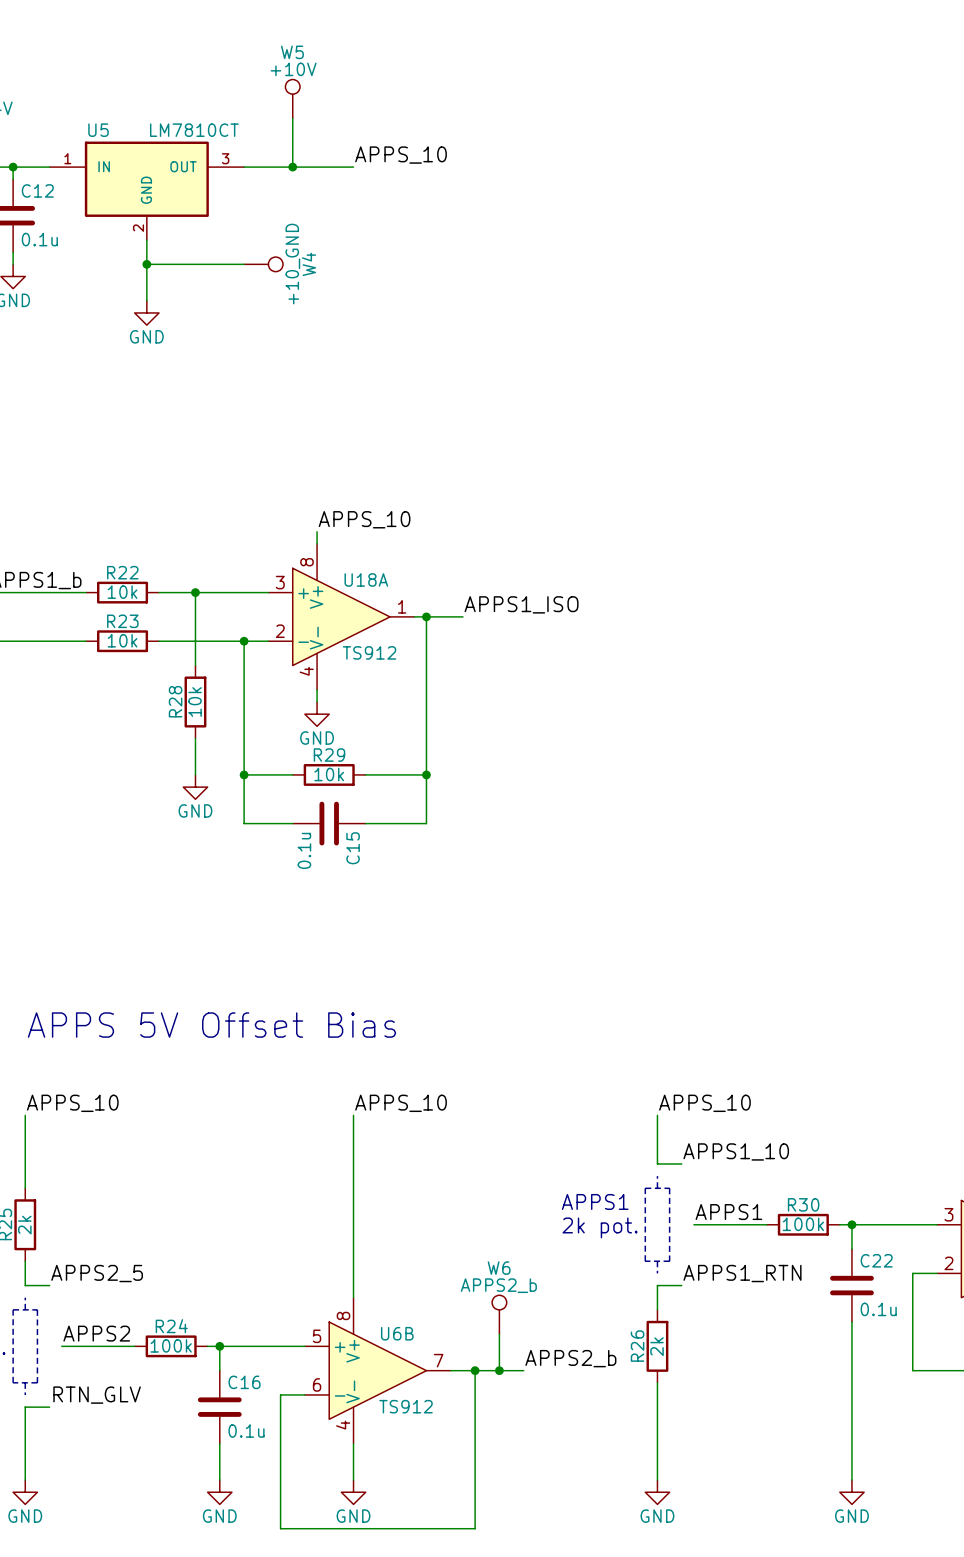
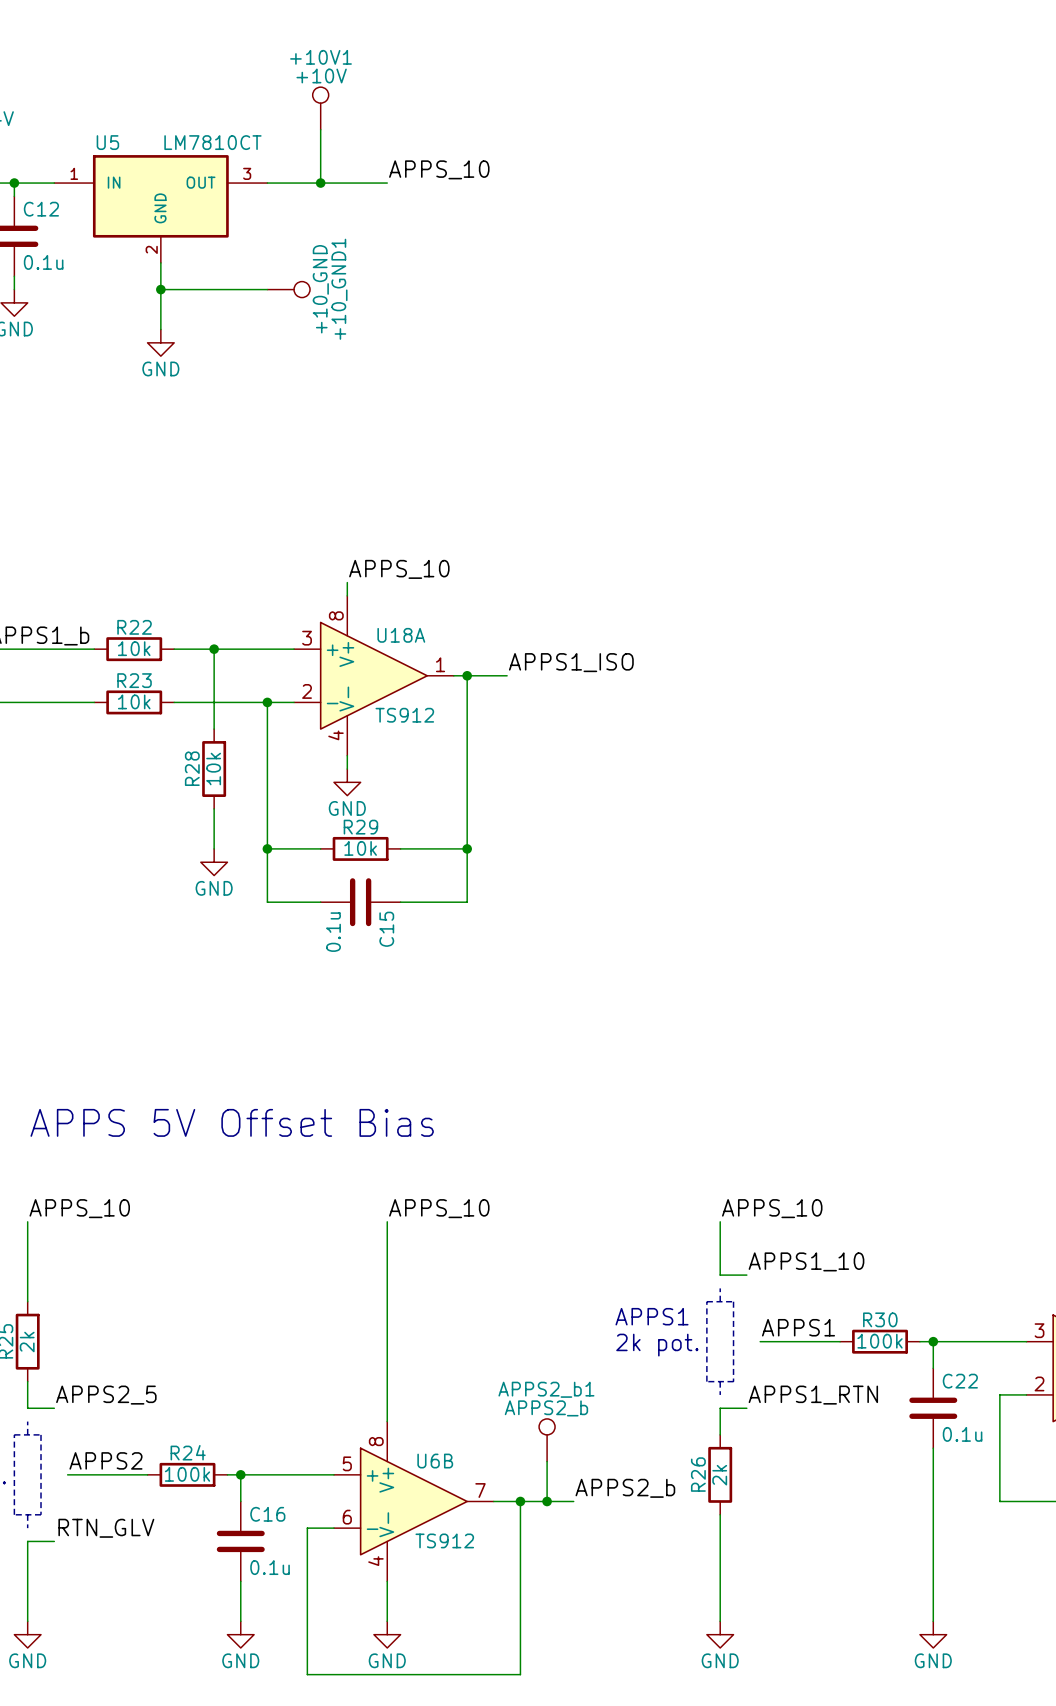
W5 name: W5 (292, 52) -> +10V1 (320, 57)
W4 name: W4 (309, 264) -> +10_GND1 (339, 289)
W6 name: W6 (499, 1268) -> APPS2_b1 (546, 1389)

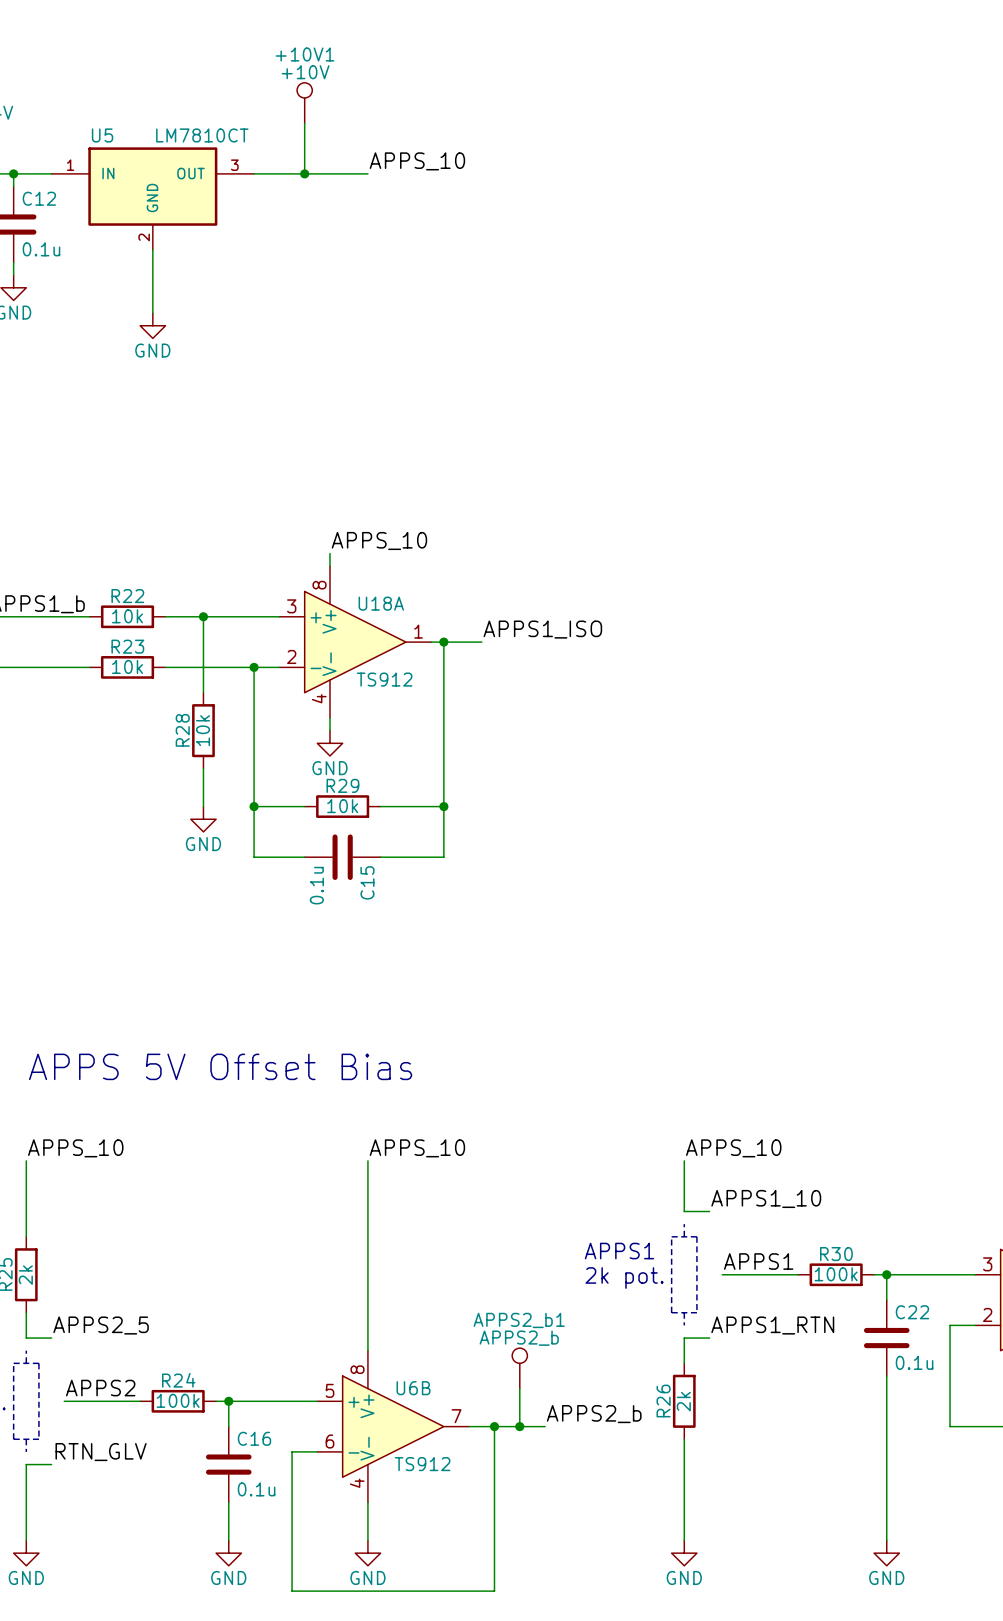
wire: (160, 289) (267, 289) -> none
junction: (160, 289) -> none
+10_GND1: +10_GND (288, 289) -> none

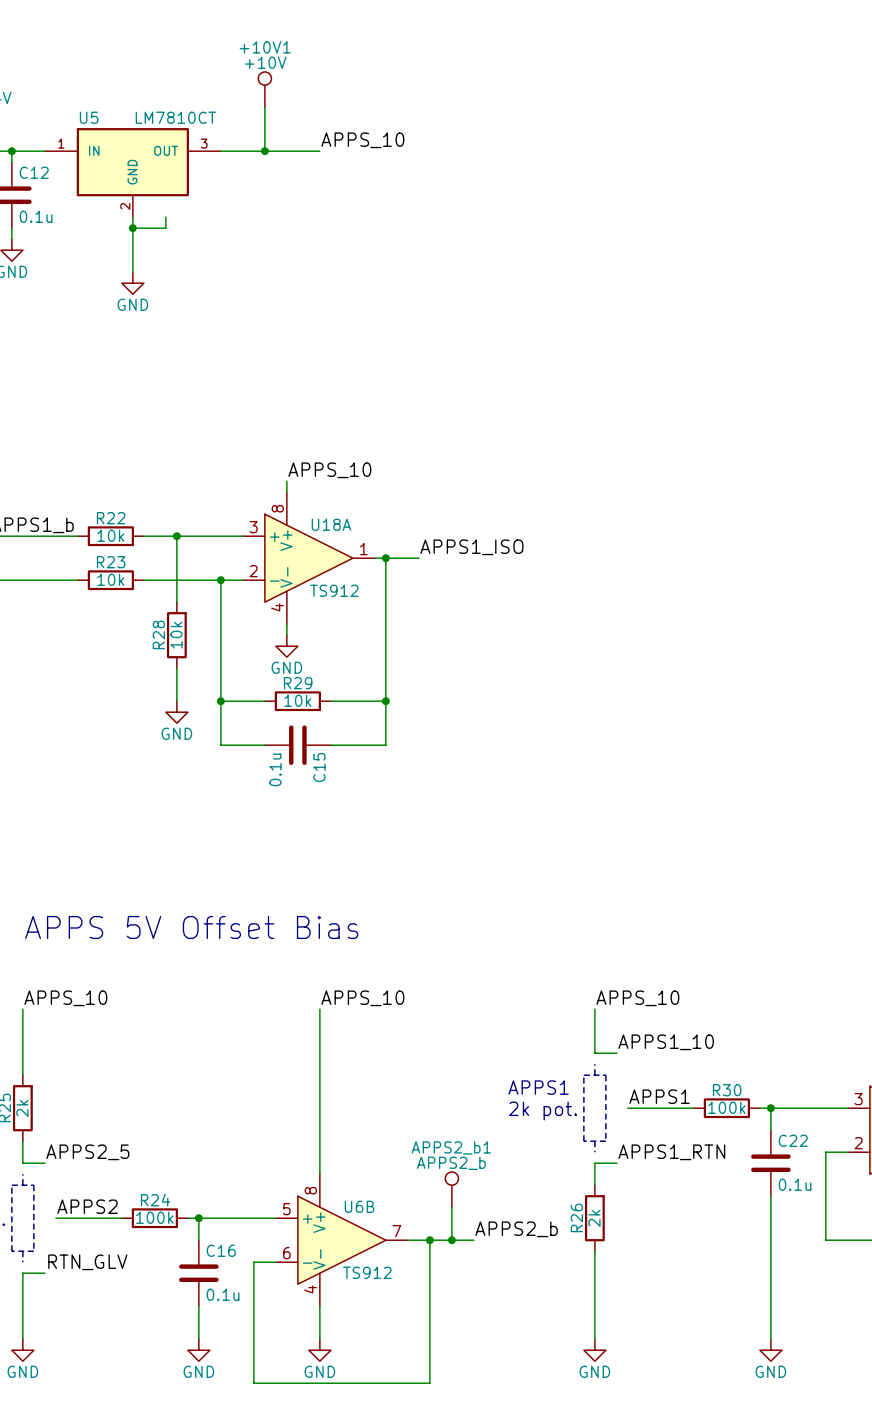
wire: none -> (165, 217) (165, 228) (132, 228)
junction: none -> (132, 228)

